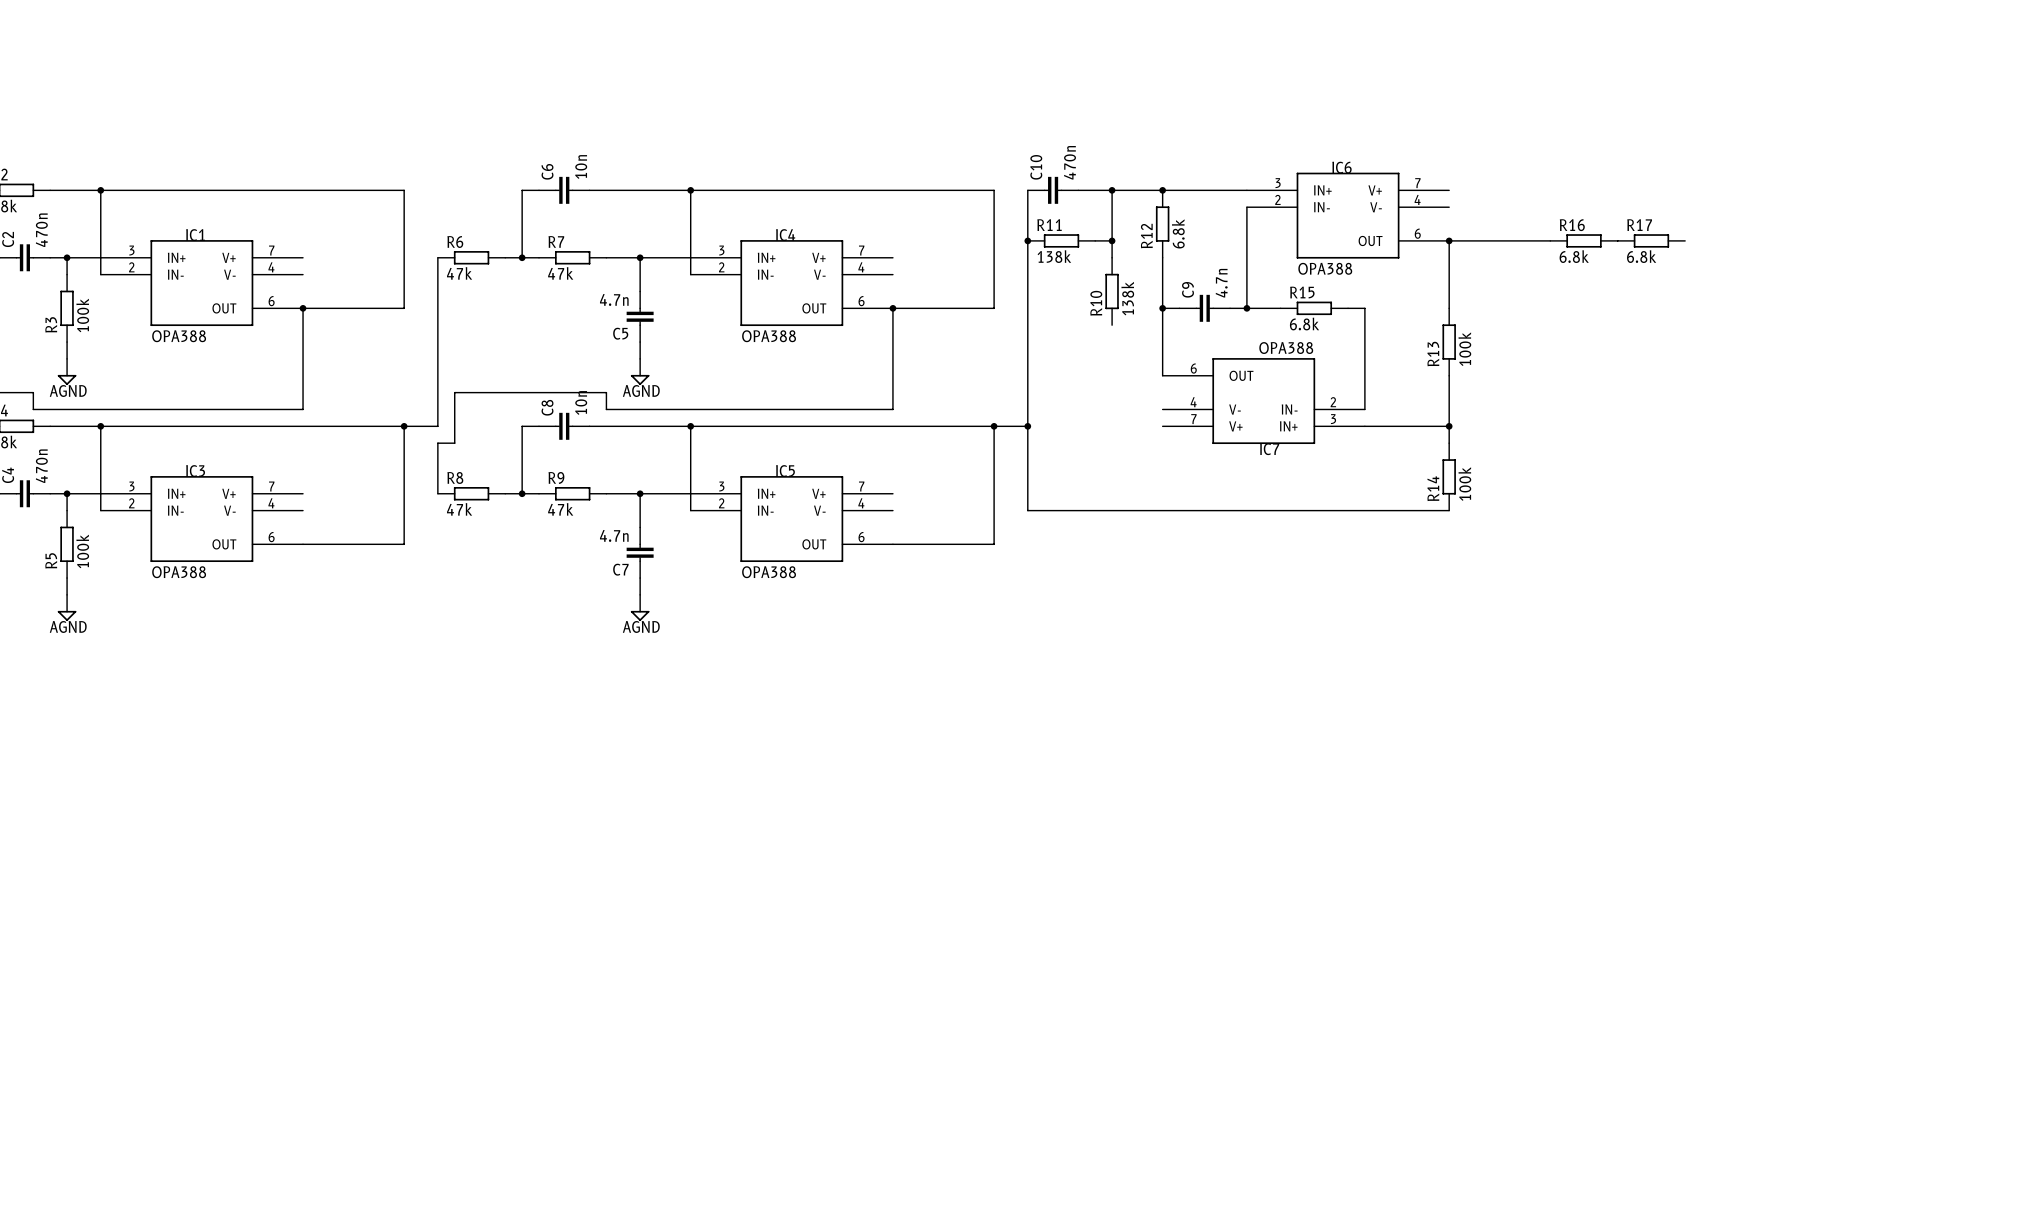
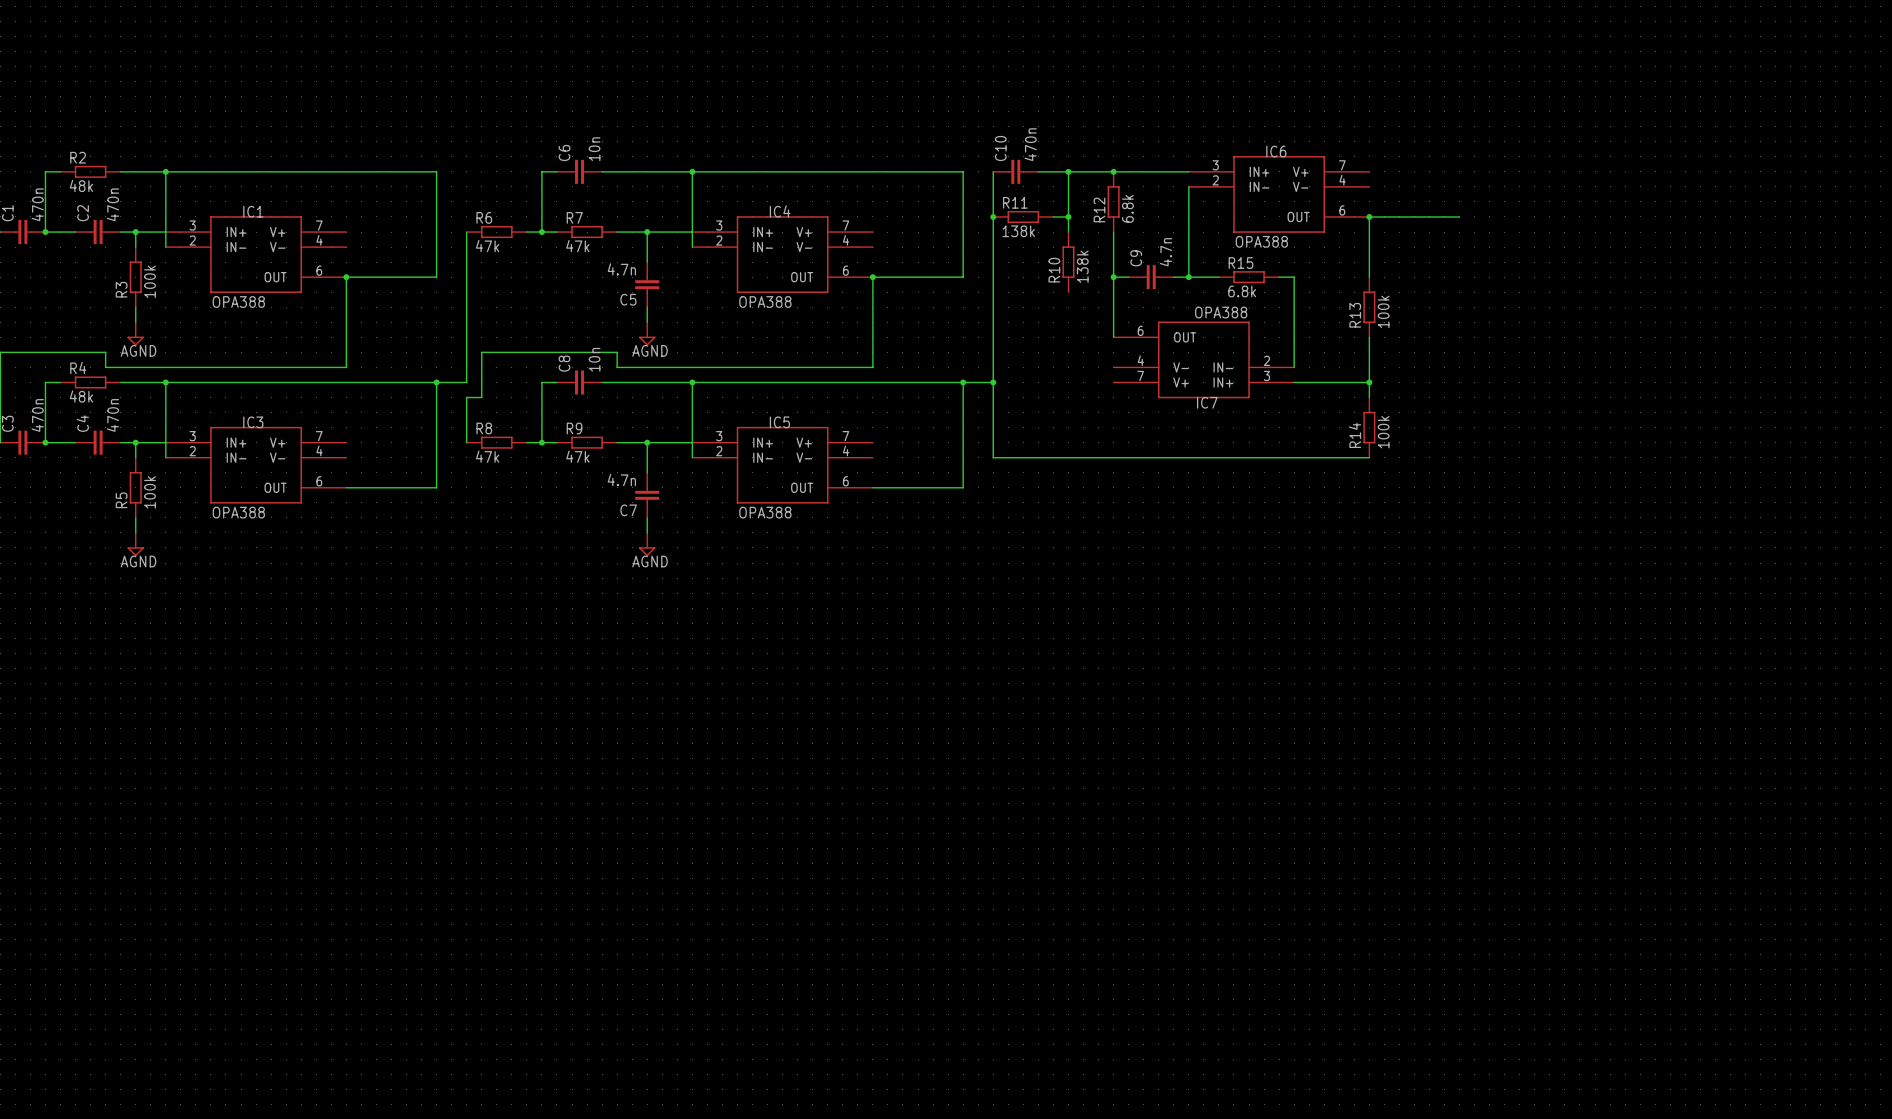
R16: 6.8k (1584, 240) -> none
R17: 6.8k (1651, 240) -> none

